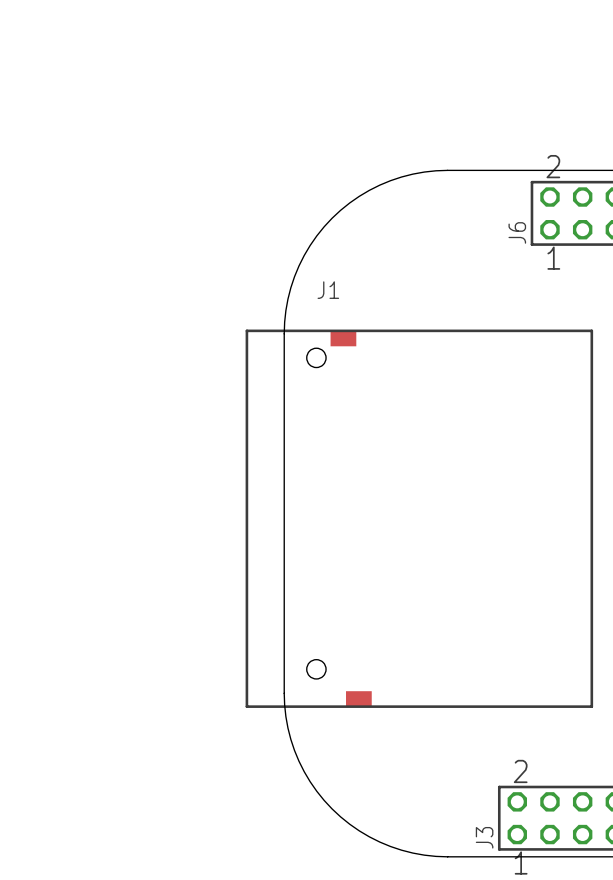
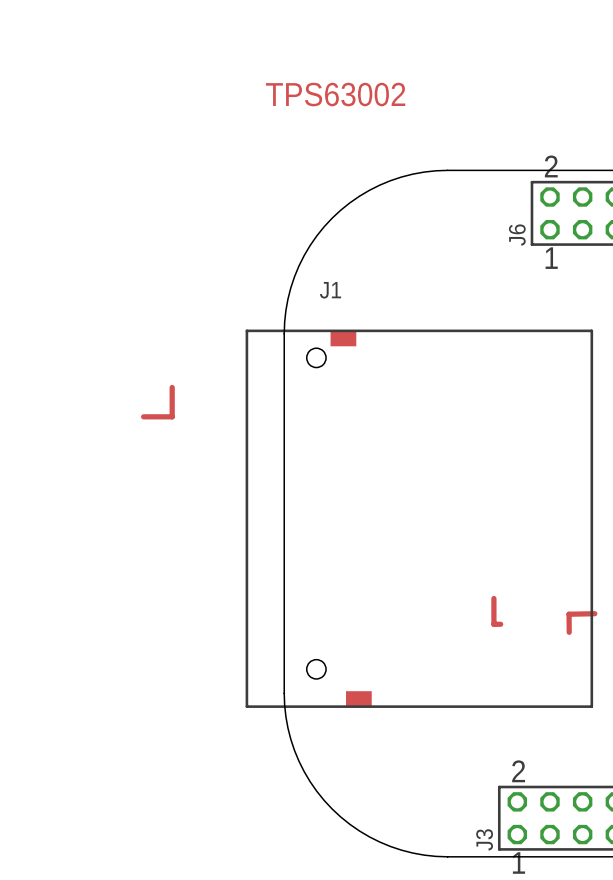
text: none -> TPS63002 (335, 94)
top track: none -> (172, 387) (172, 416) (143, 416)
top track: none -> (493, 598) (493, 624) (500, 624)
top track: none -> (594, 613) (569, 614) (569, 632)

